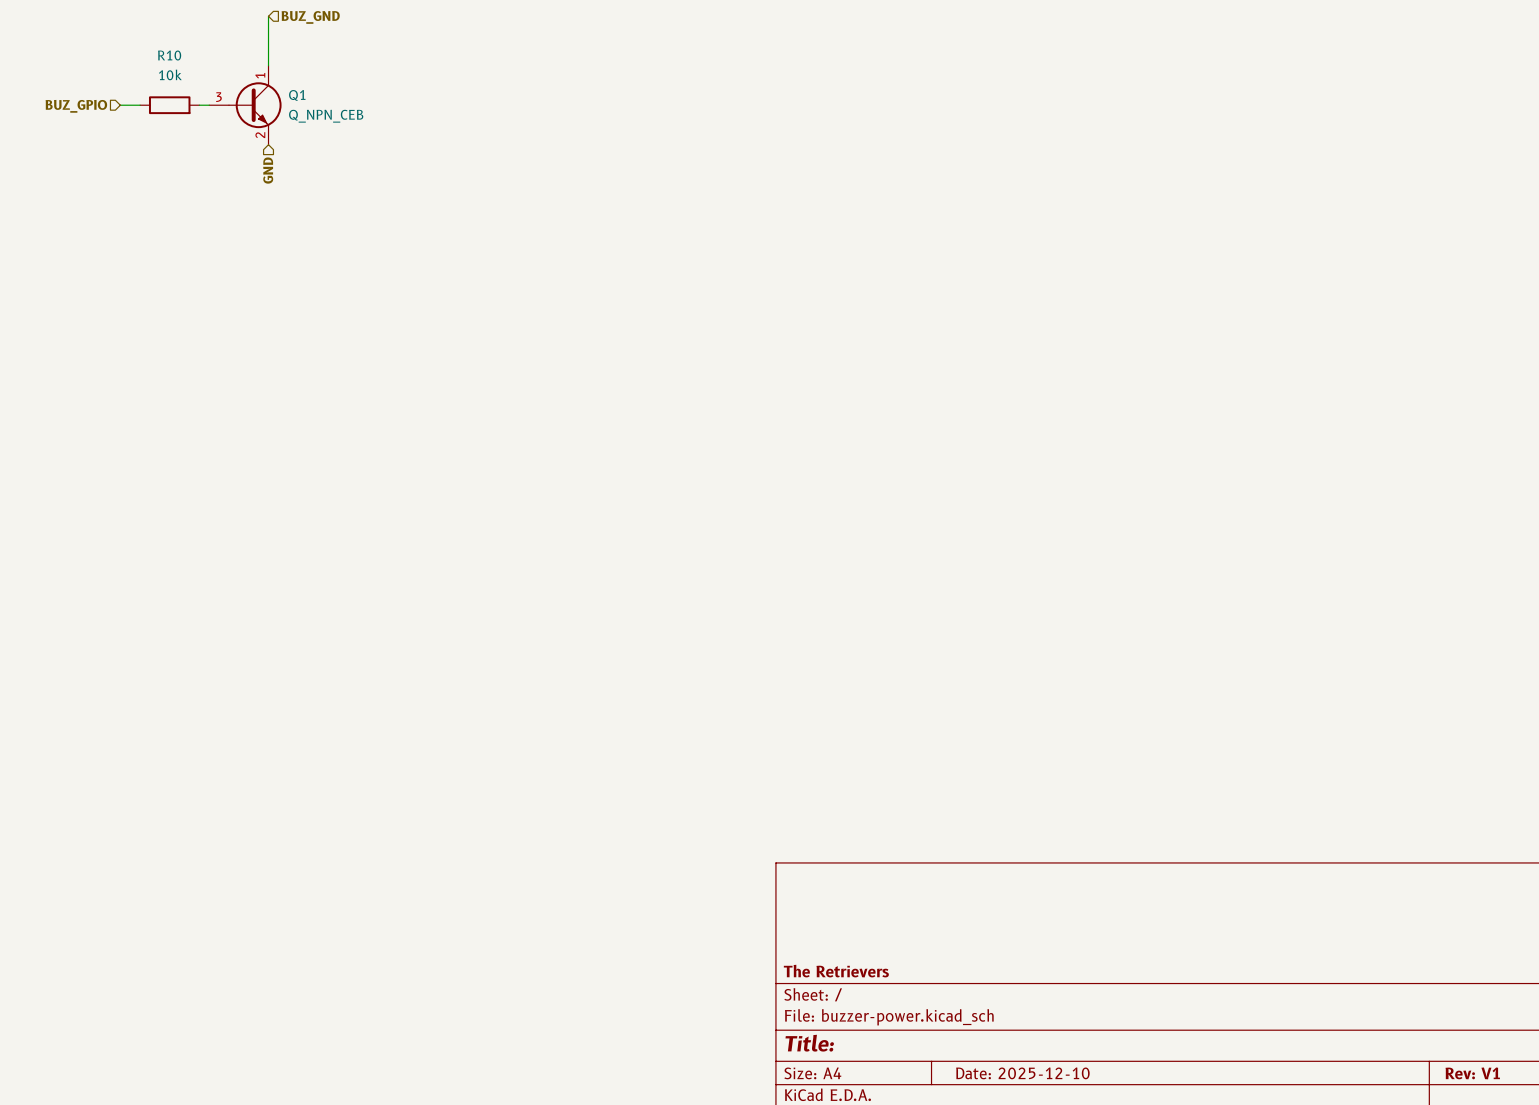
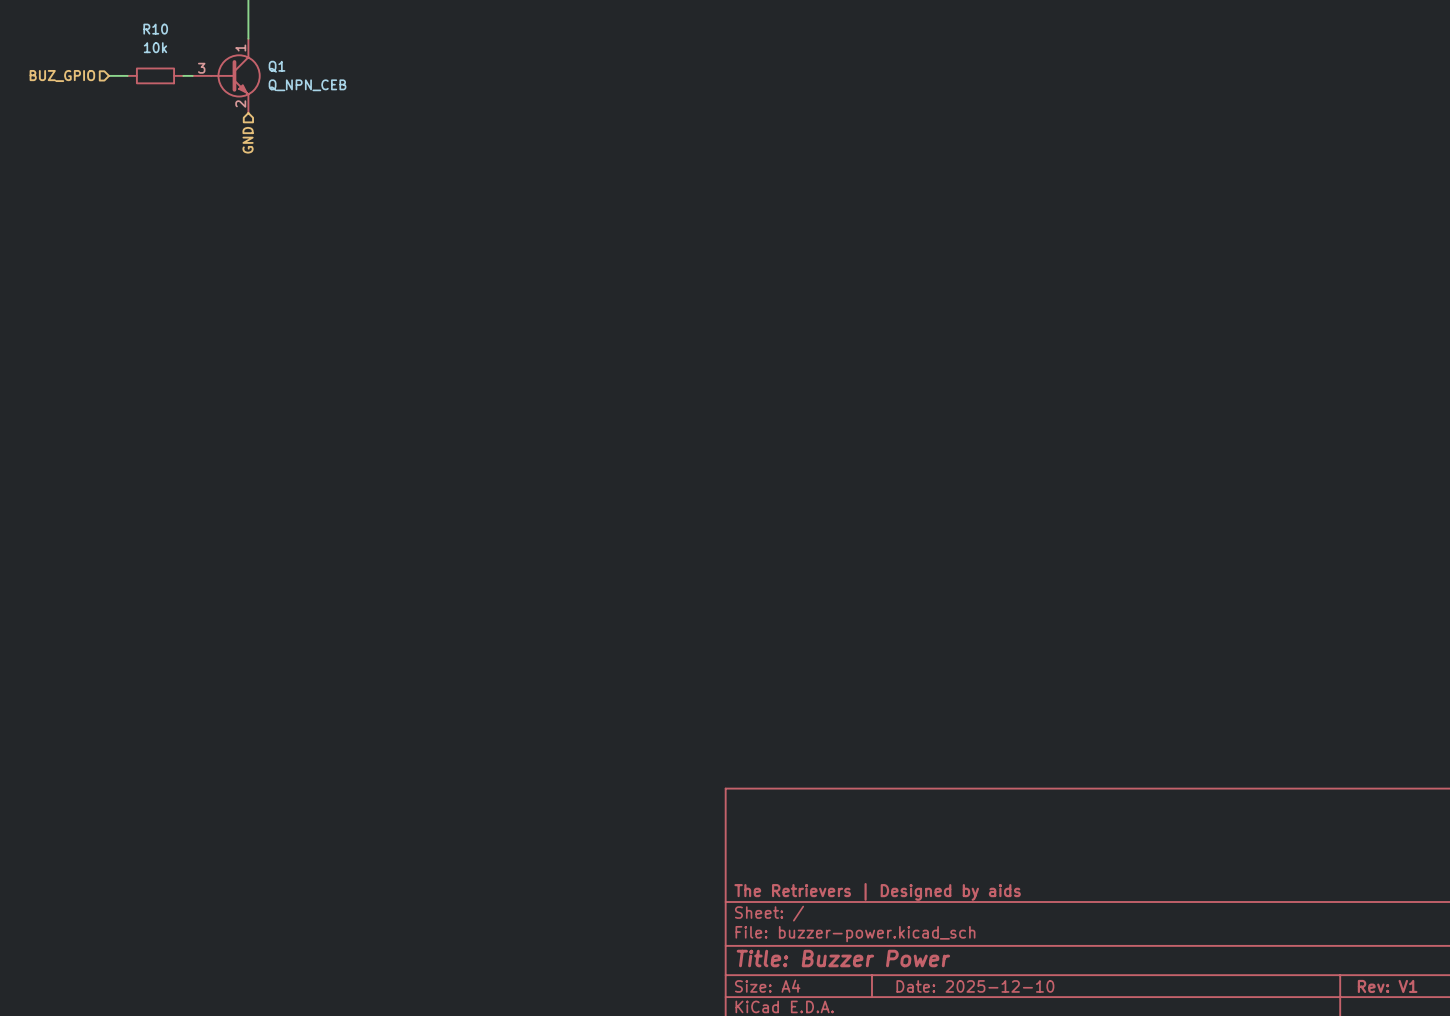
title block: The Retrievers (836, 971) -> The Retrievers | Designed by aids (877, 891)
title block: Title: (809, 1043) -> Title: Buzzer Power (843, 958)

